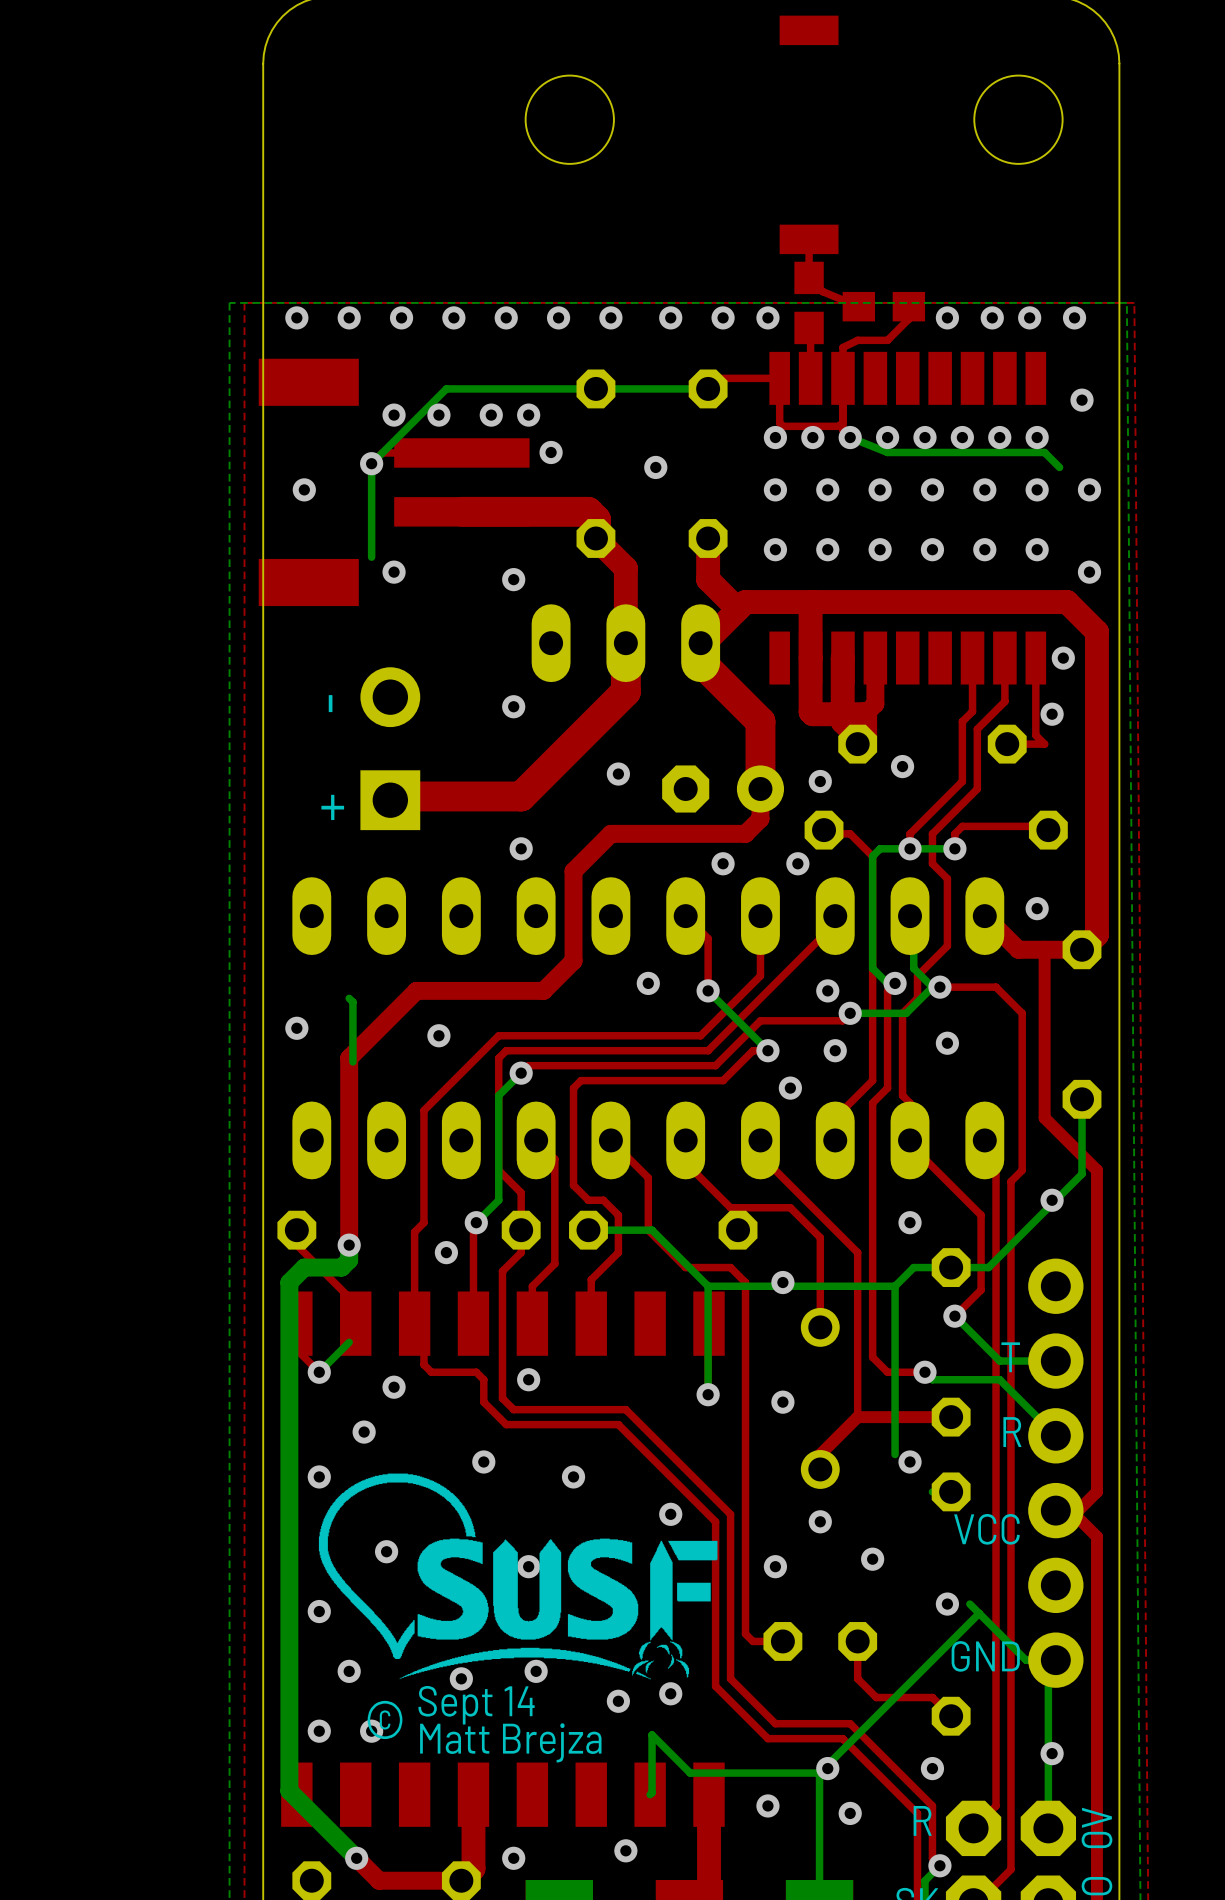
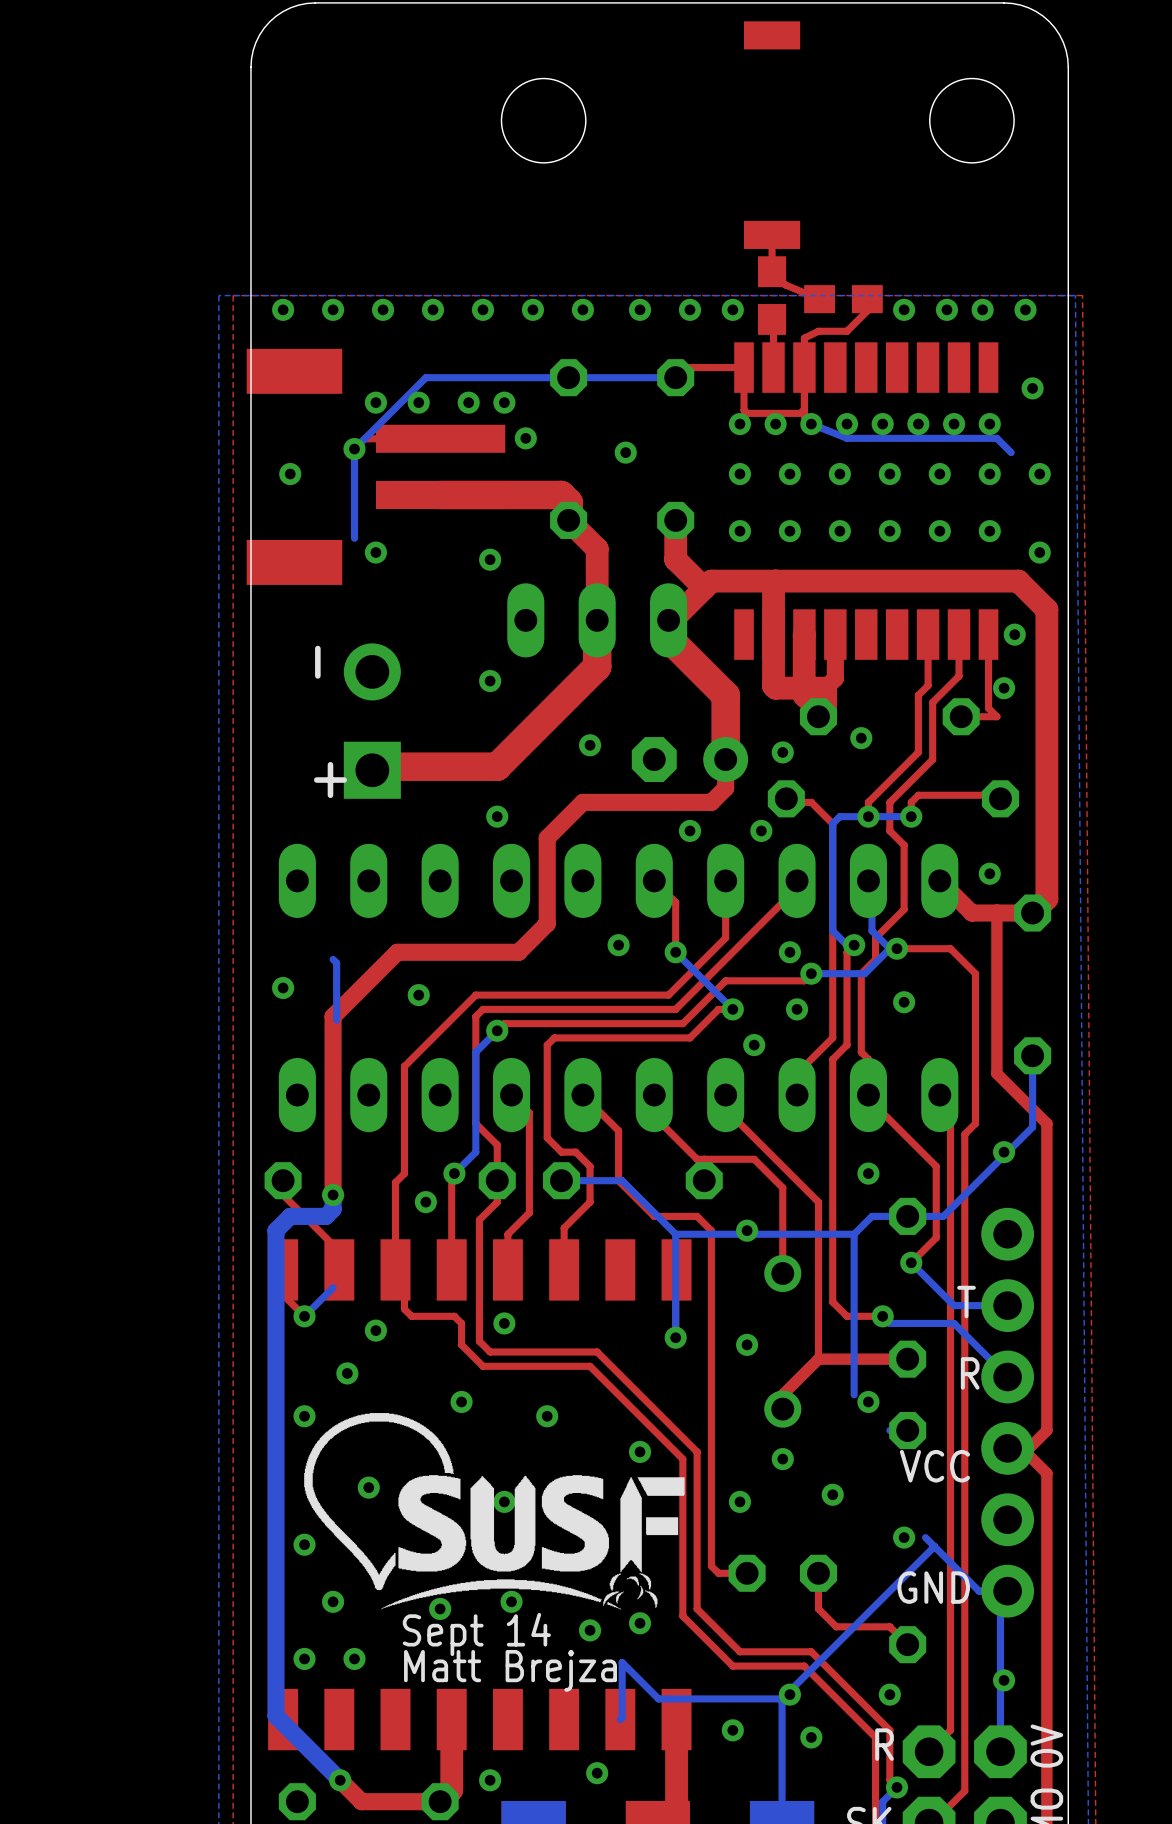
text: © (385, 1719) -> none

